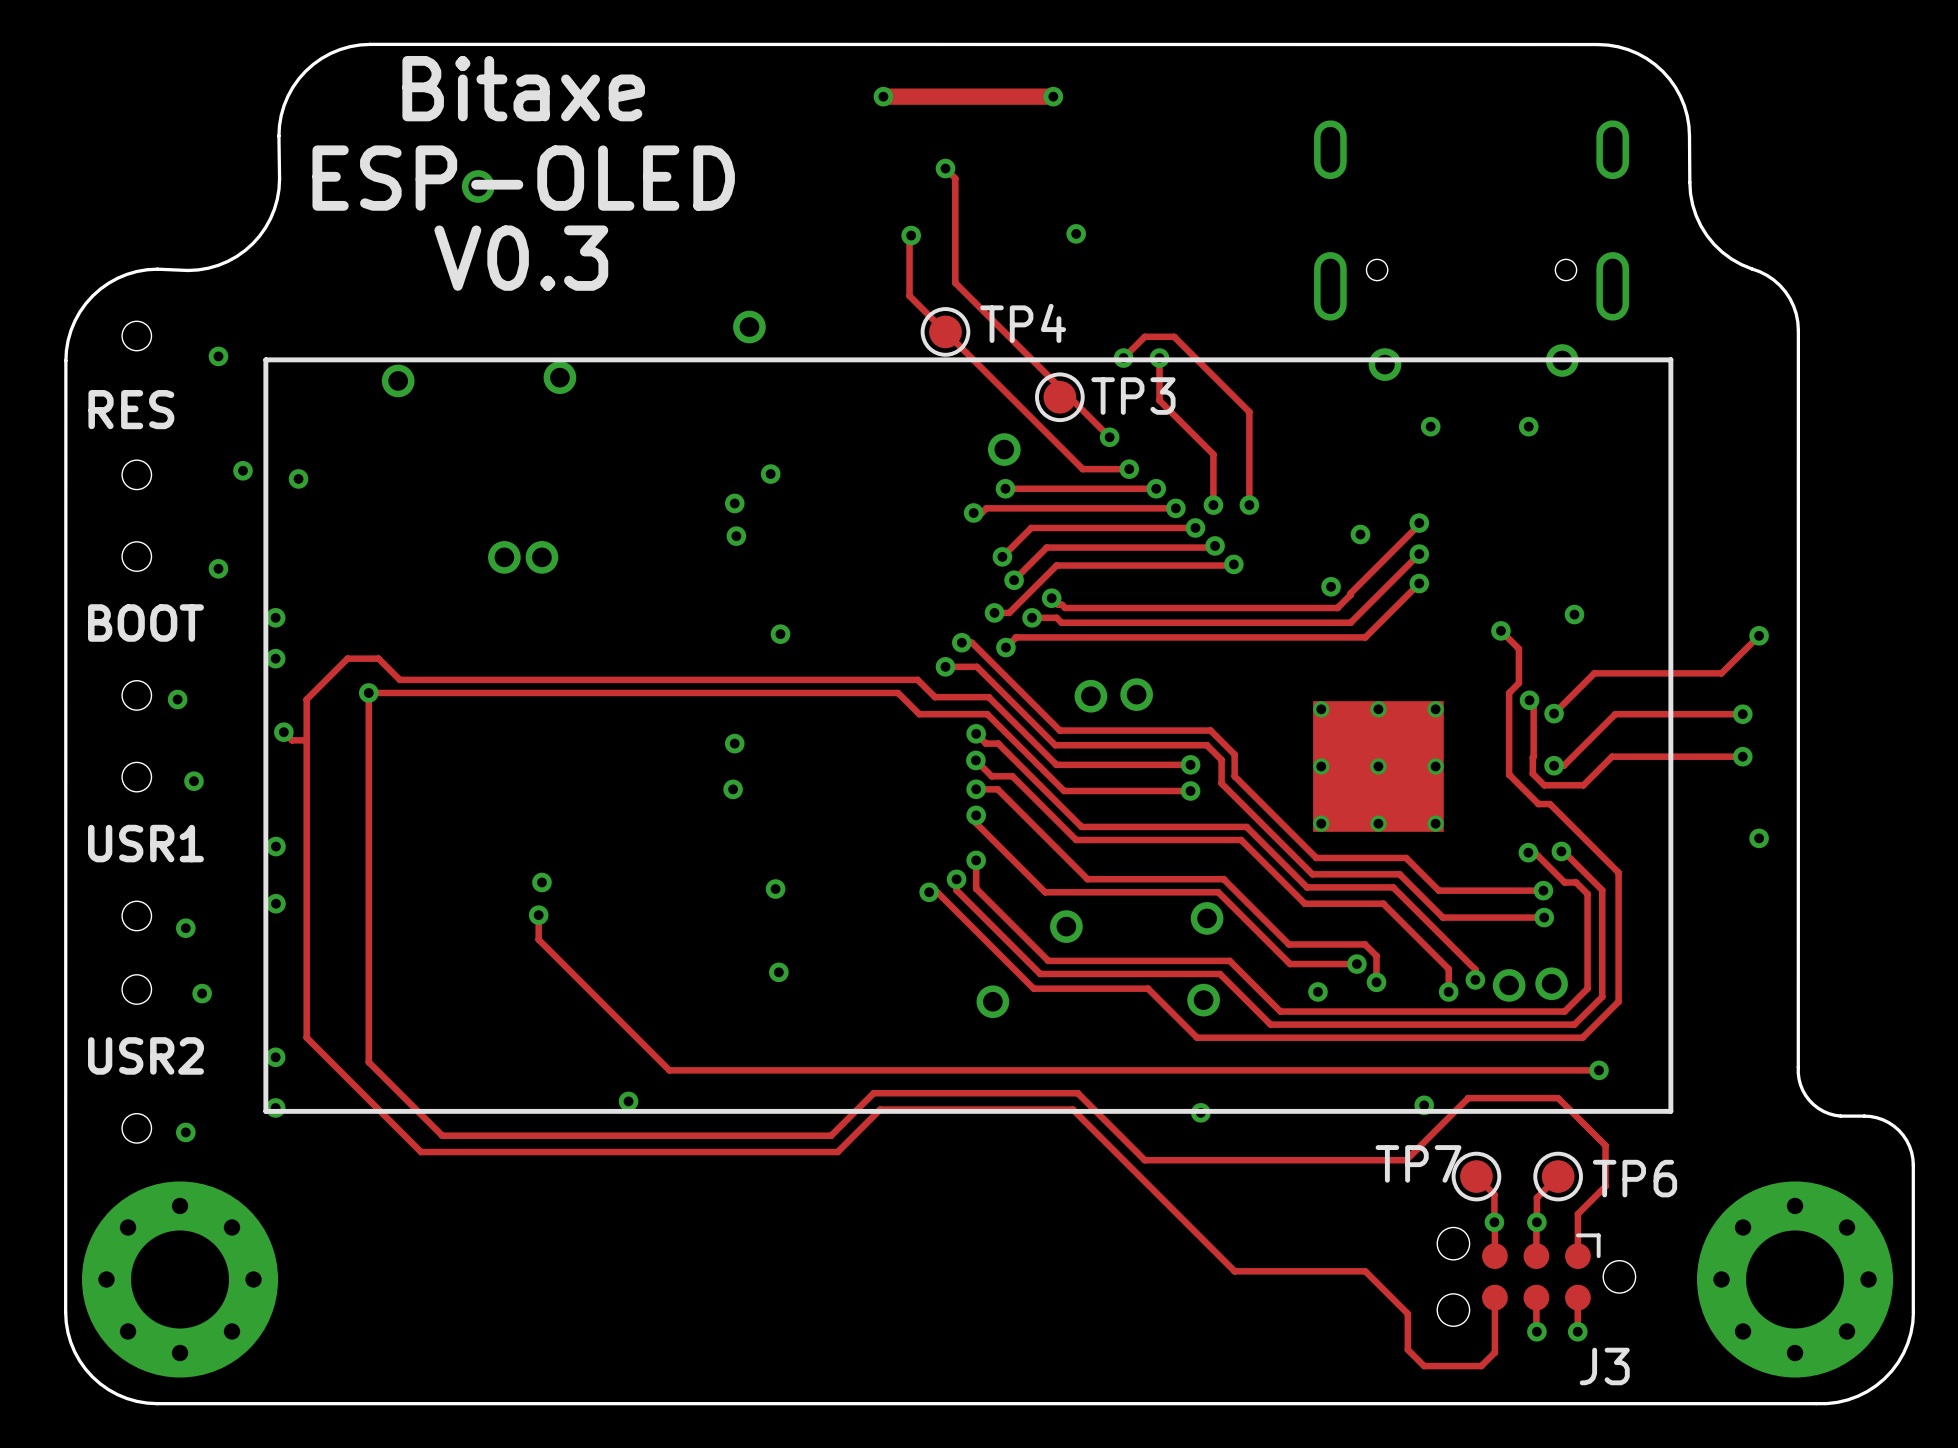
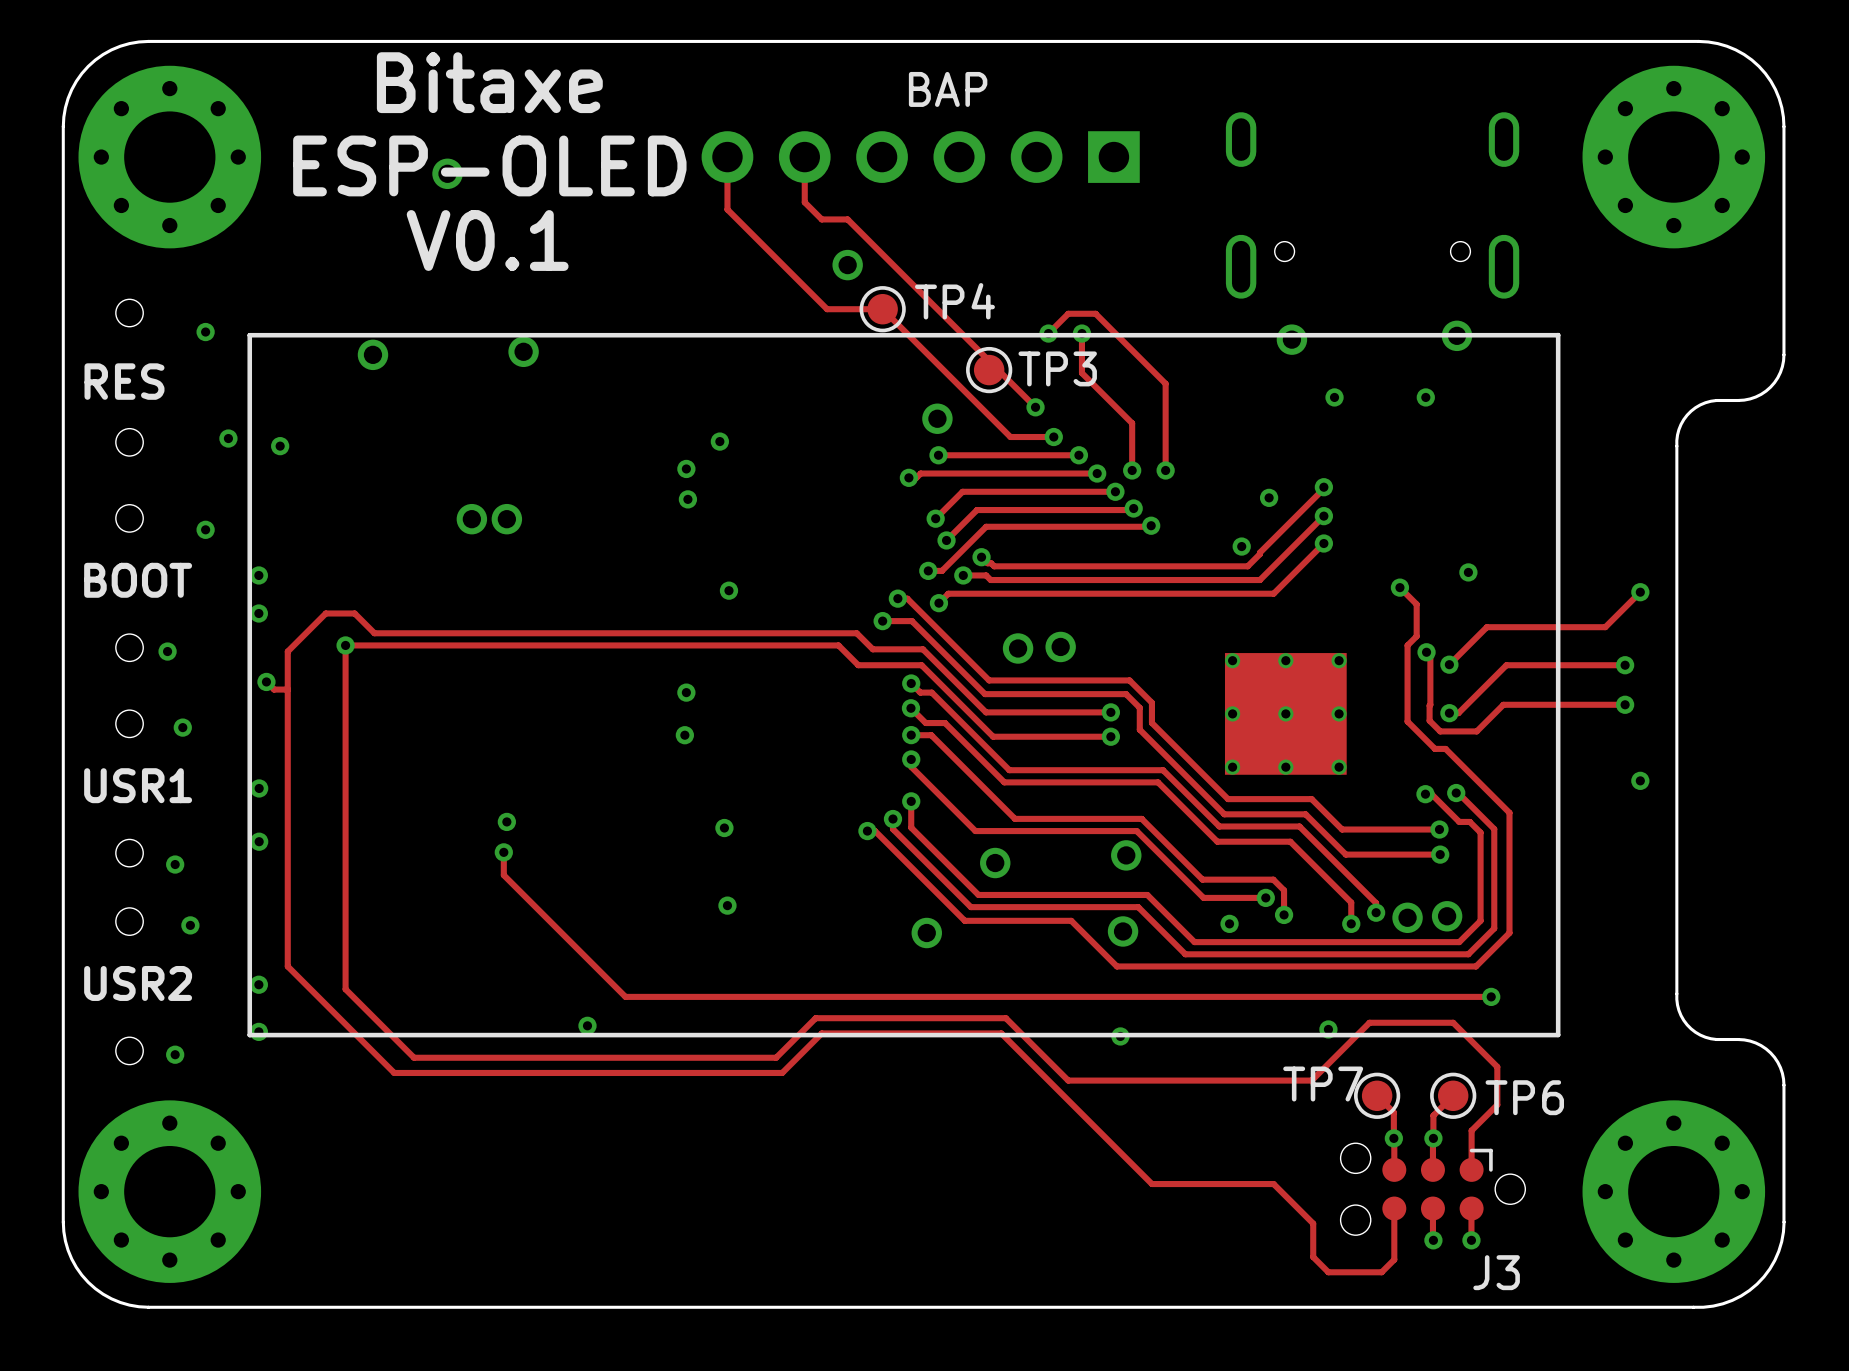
text: none -> BAP (948, 89)
track: (883, 96) (1053, 96) -> none
via: (883, 96) -> none
via: (1053, 96) -> none
part: none -> (169, 157)
track: (945, 168) (955, 178) (955, 282) -> (804, 157) (804, 202) (821, 219) (847, 219) (891, 263)
via: (945, 168) -> none
part: none -> (920, 157)
part: none -> (1673, 157)
via: (1076, 233) -> none
track: (911, 235) (909, 237) (909, 295) (945, 331) -> (727, 157) (727, 209) (827, 309) (882, 309)
via: (911, 235) -> none
text: V0.3 (521, 258) -> V0.1 (487, 240)
via position: (749, 327) -> (847, 265)
board edge: (1798, 1067) (1797, 322) (1793, 306) (1779, 285) (1766, 275) (1741, 264) (1722, 252) (1700, 225) (1690, 193) (1687, 115) (1675, 87) (1655, 64) (1628, 49) (1598, 44) (360, 44) (330, 53) (313, 64) (298, 78) (287, 96) (279, 125) (279, 179) (277, 199) (270, 218) (252, 243) (236, 256) (208, 268) (188, 270) (147, 269) (117, 278) (100, 289) (85, 303) (74, 320) (68, 340) (65, 360) (65, 1312) -> (1676, 993) (1677, 435) (1683, 419) (1700, 404) (1716, 400) (1750, 398) (1766, 391) (1777, 377) (1783, 360) (1783, 117) (1779, 98) (1770, 81) (1759, 66) (1744, 54) (1717, 43) (1698, 41) (138, 41) (111, 49) (88, 66) (71, 89) (63, 117) (63, 1222)

